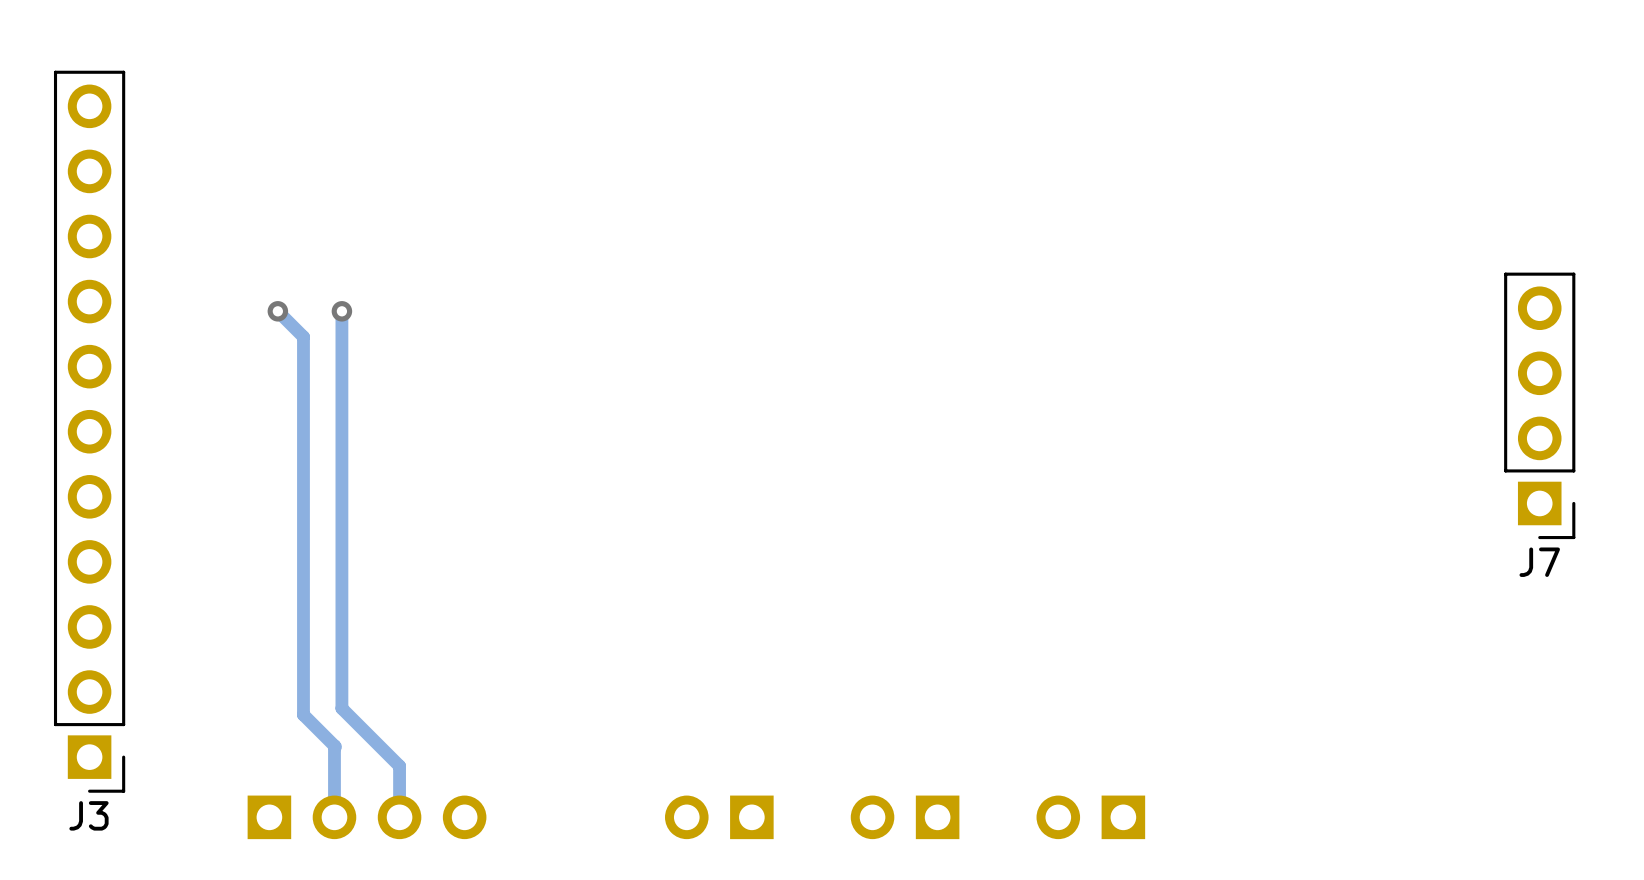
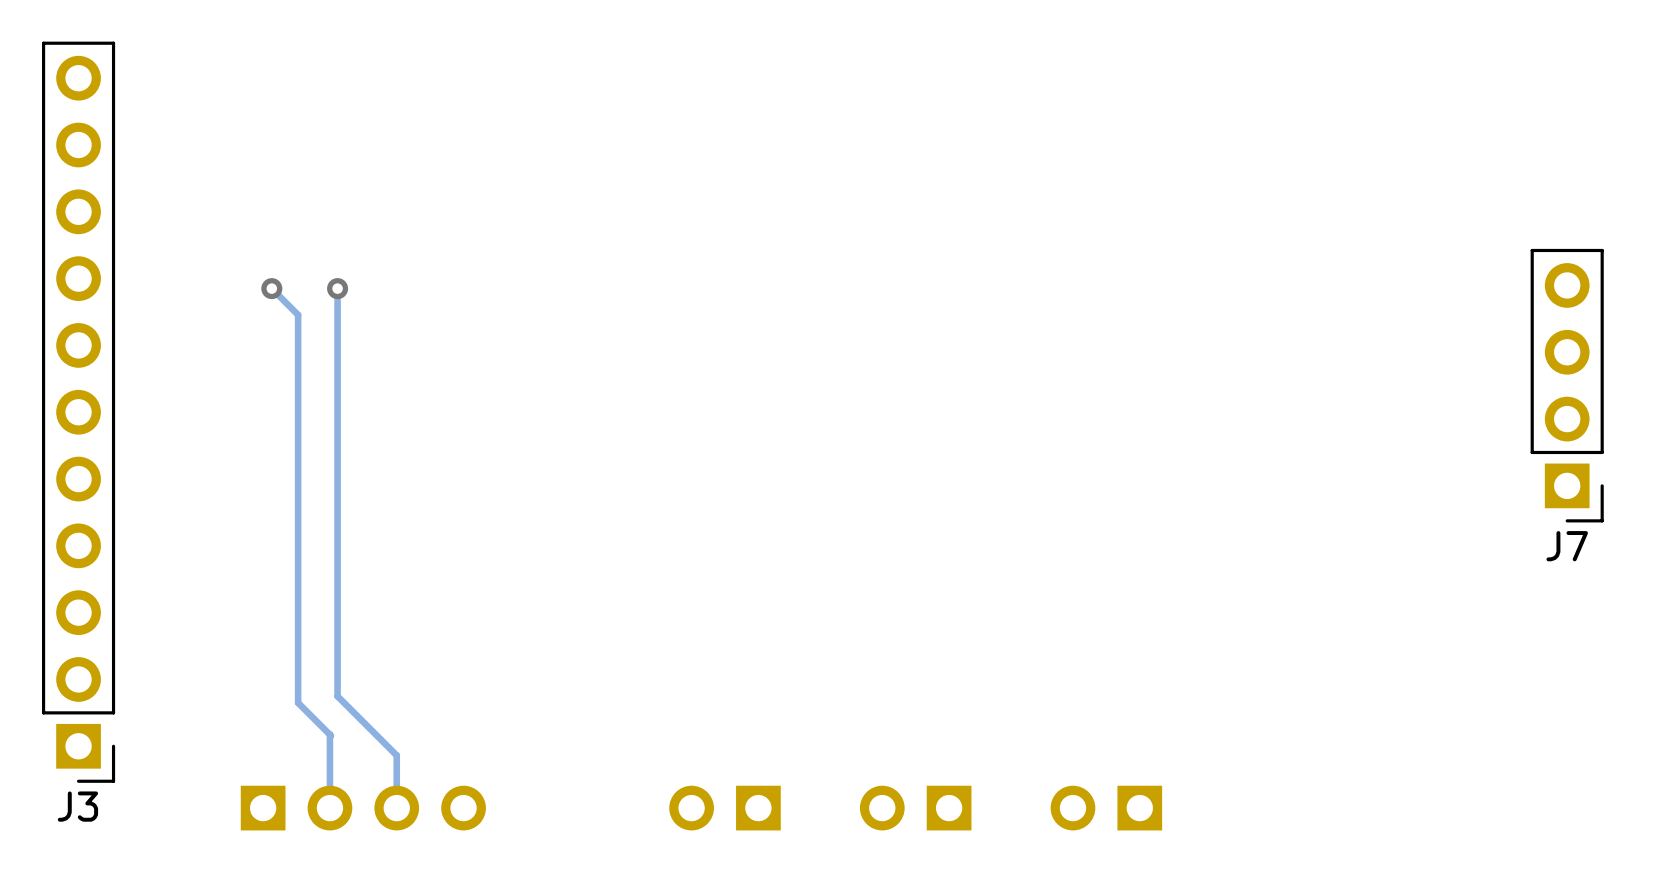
track width: thick (277, 311) (303, 336) (303, 714) (335, 746) -> thin (271, 288) (298, 314) (298, 702) (331, 735)
track width: thick (341, 311) (341, 708) (399, 766) (399, 817) -> thin (337, 288) (337, 696) (396, 755) (396, 808)
track width: thick (334, 745) (334, 817) -> thin (329, 734) (329, 808)

